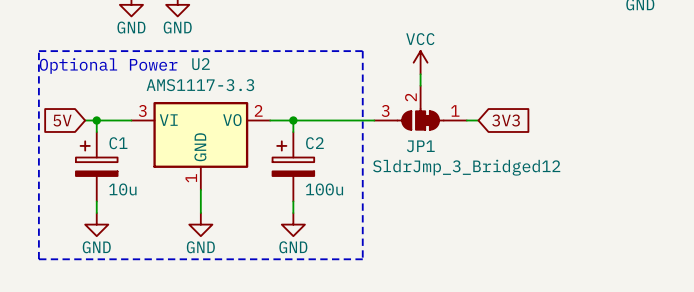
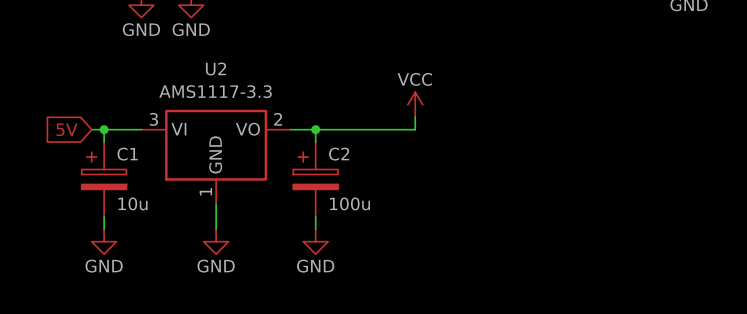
line: (38, 51) (38, 259) (362, 259) (362, 51) (38, 51) -> none
power symbol position: VCC (420, 62) -> VCC (415, 104)
text: Optional Power (108, 66) -> none
wire: (420, 74) (420, 85) -> none
JP1: SldrJmp_3_Bridged12 (420, 107) -> none
wire: (466, 120) (478, 120) -> none
global label: 3V3 (506, 120) -> none

